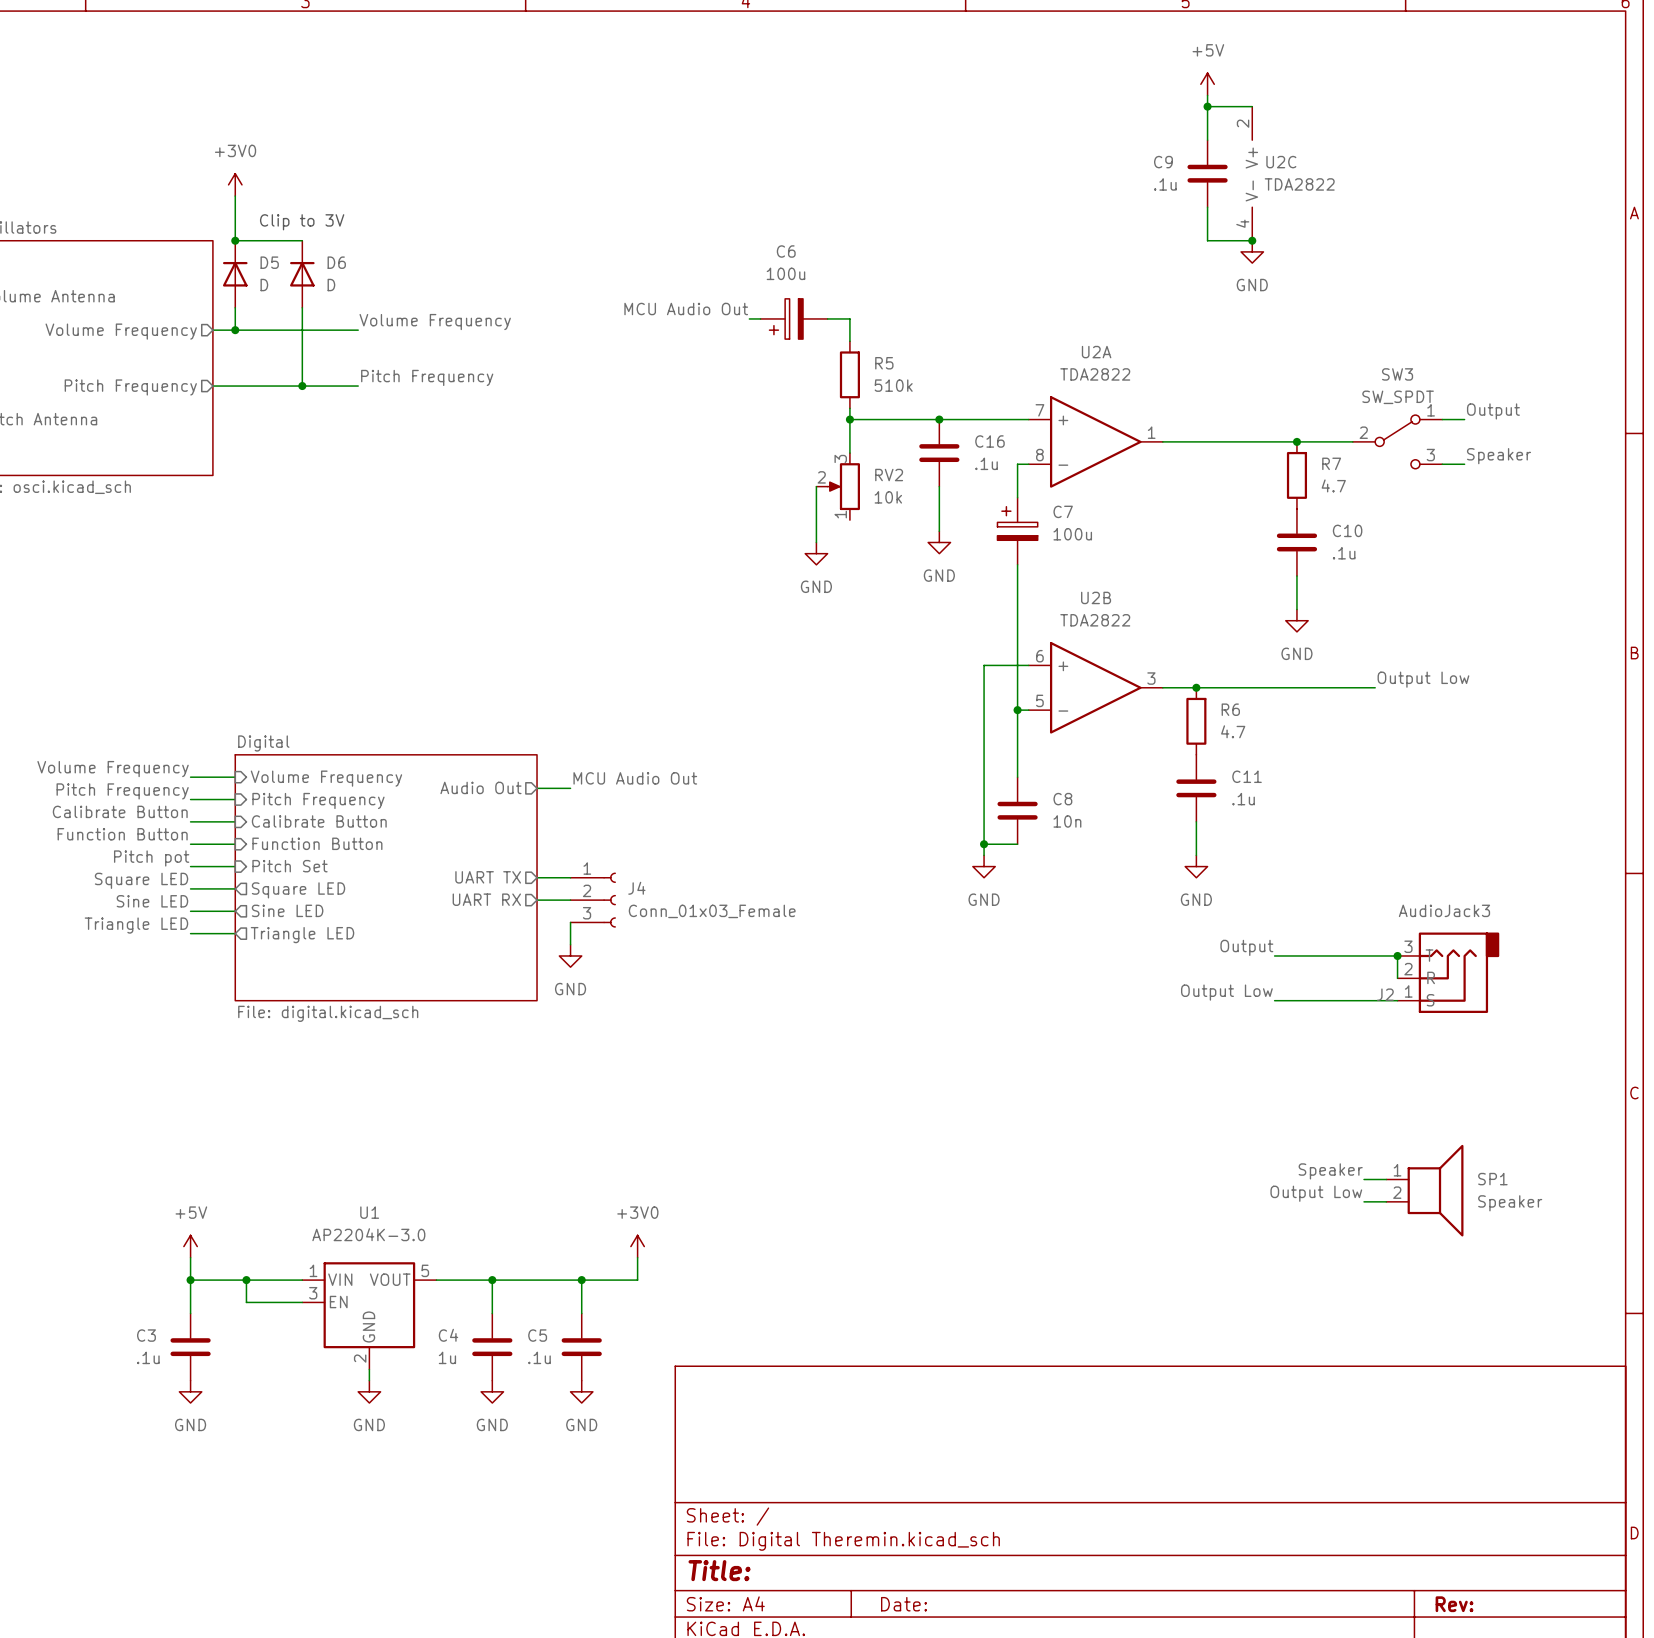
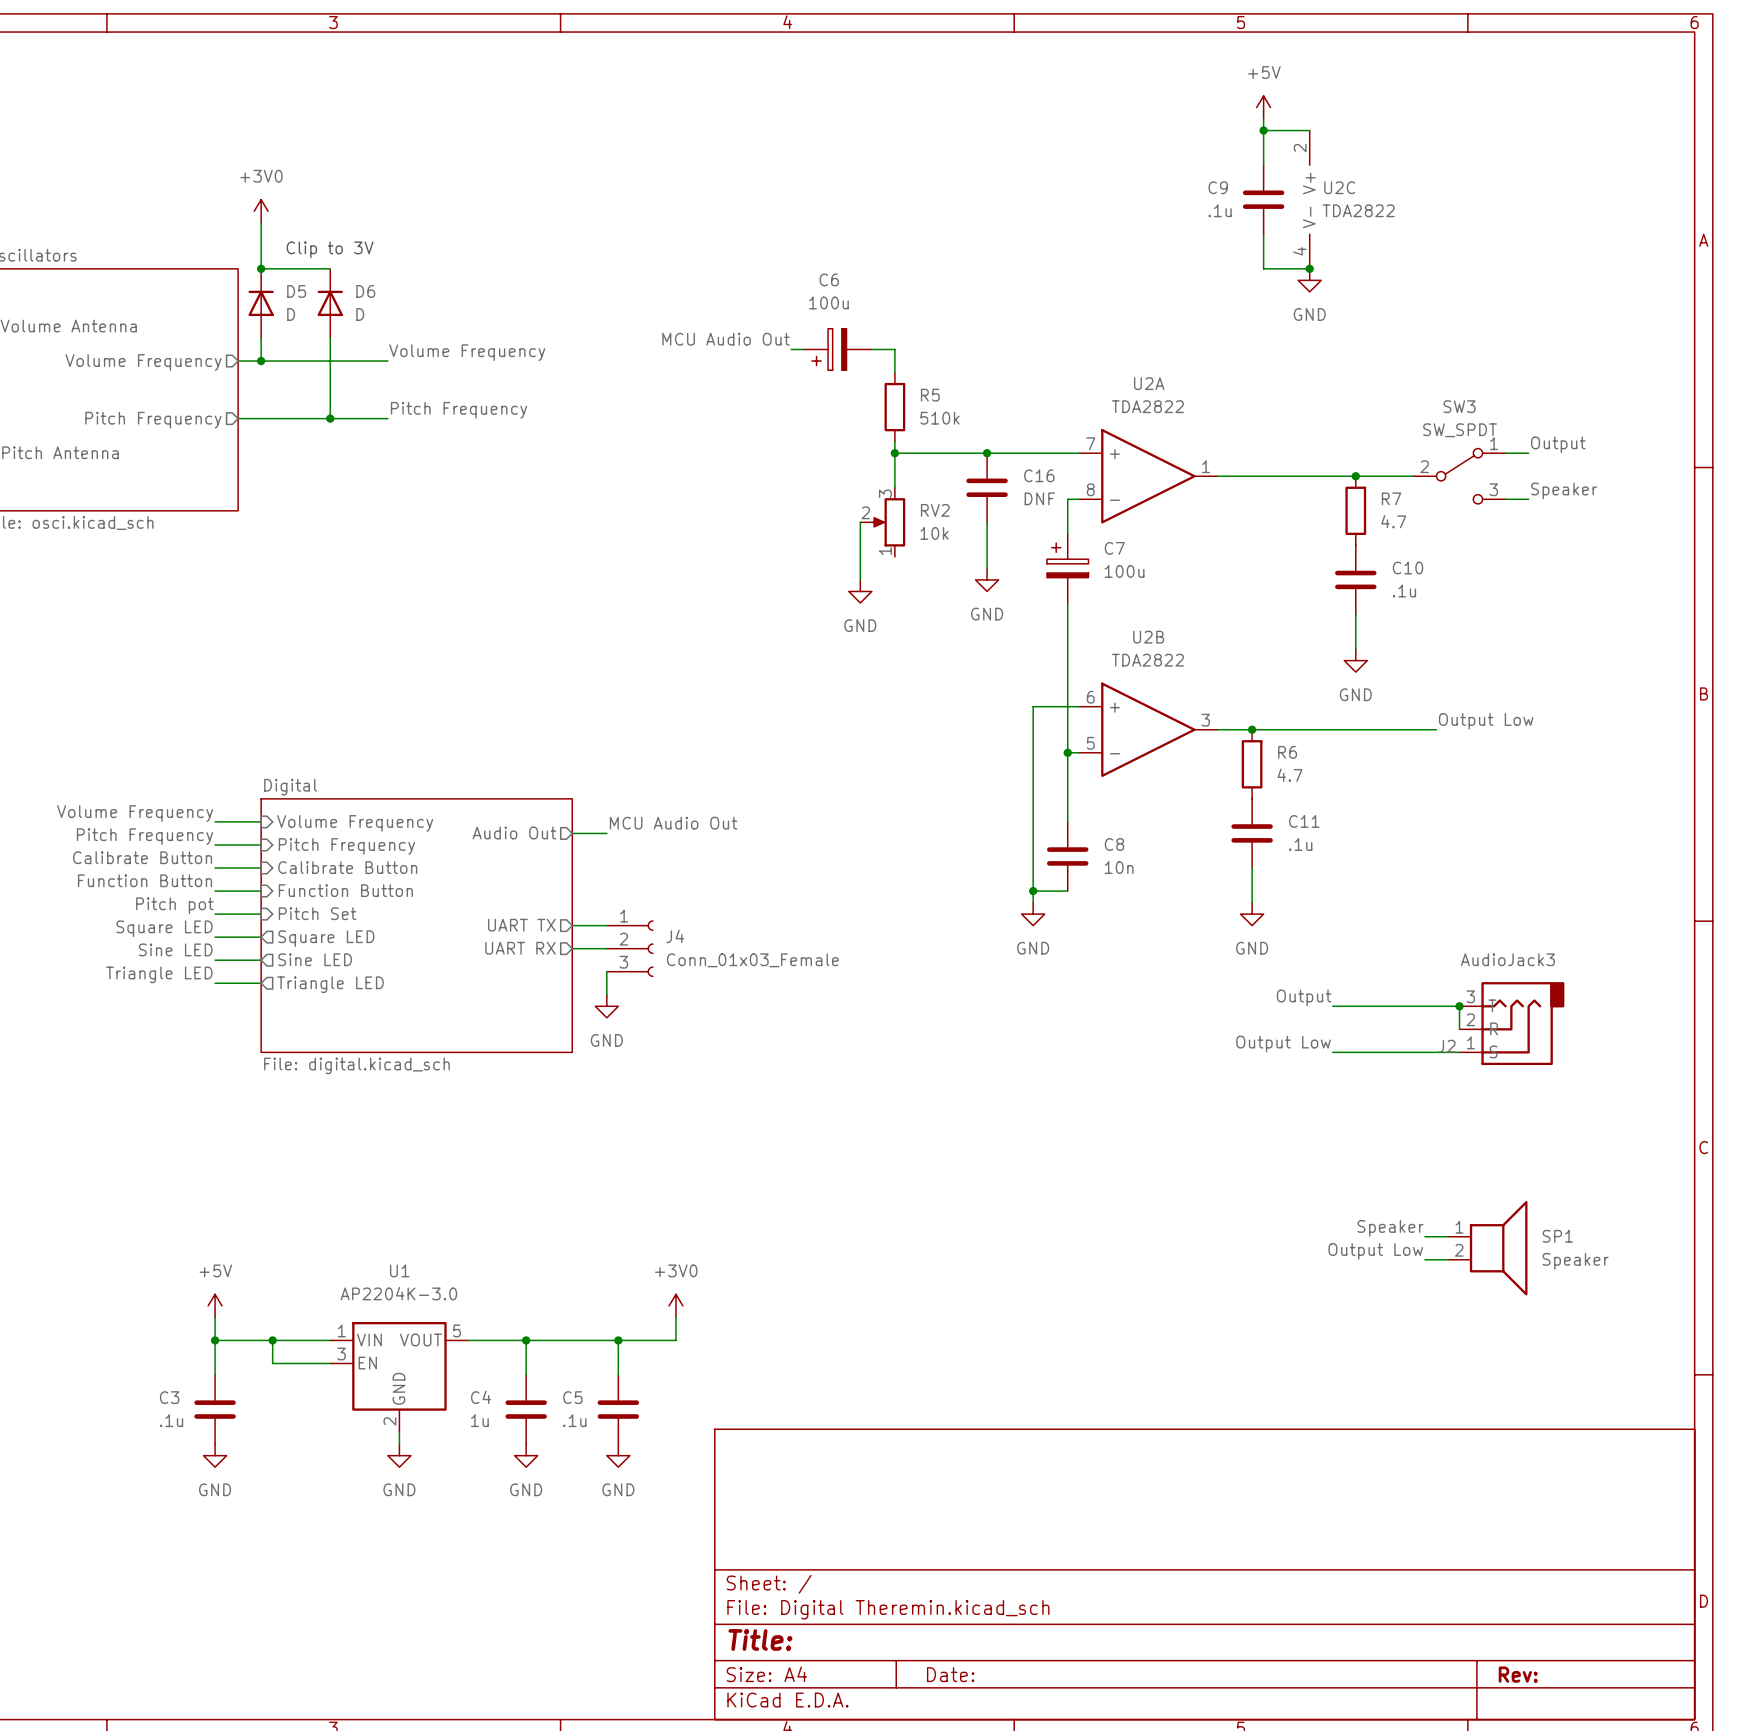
C16 value: .1u (986, 463) -> DNF (1039, 498)

